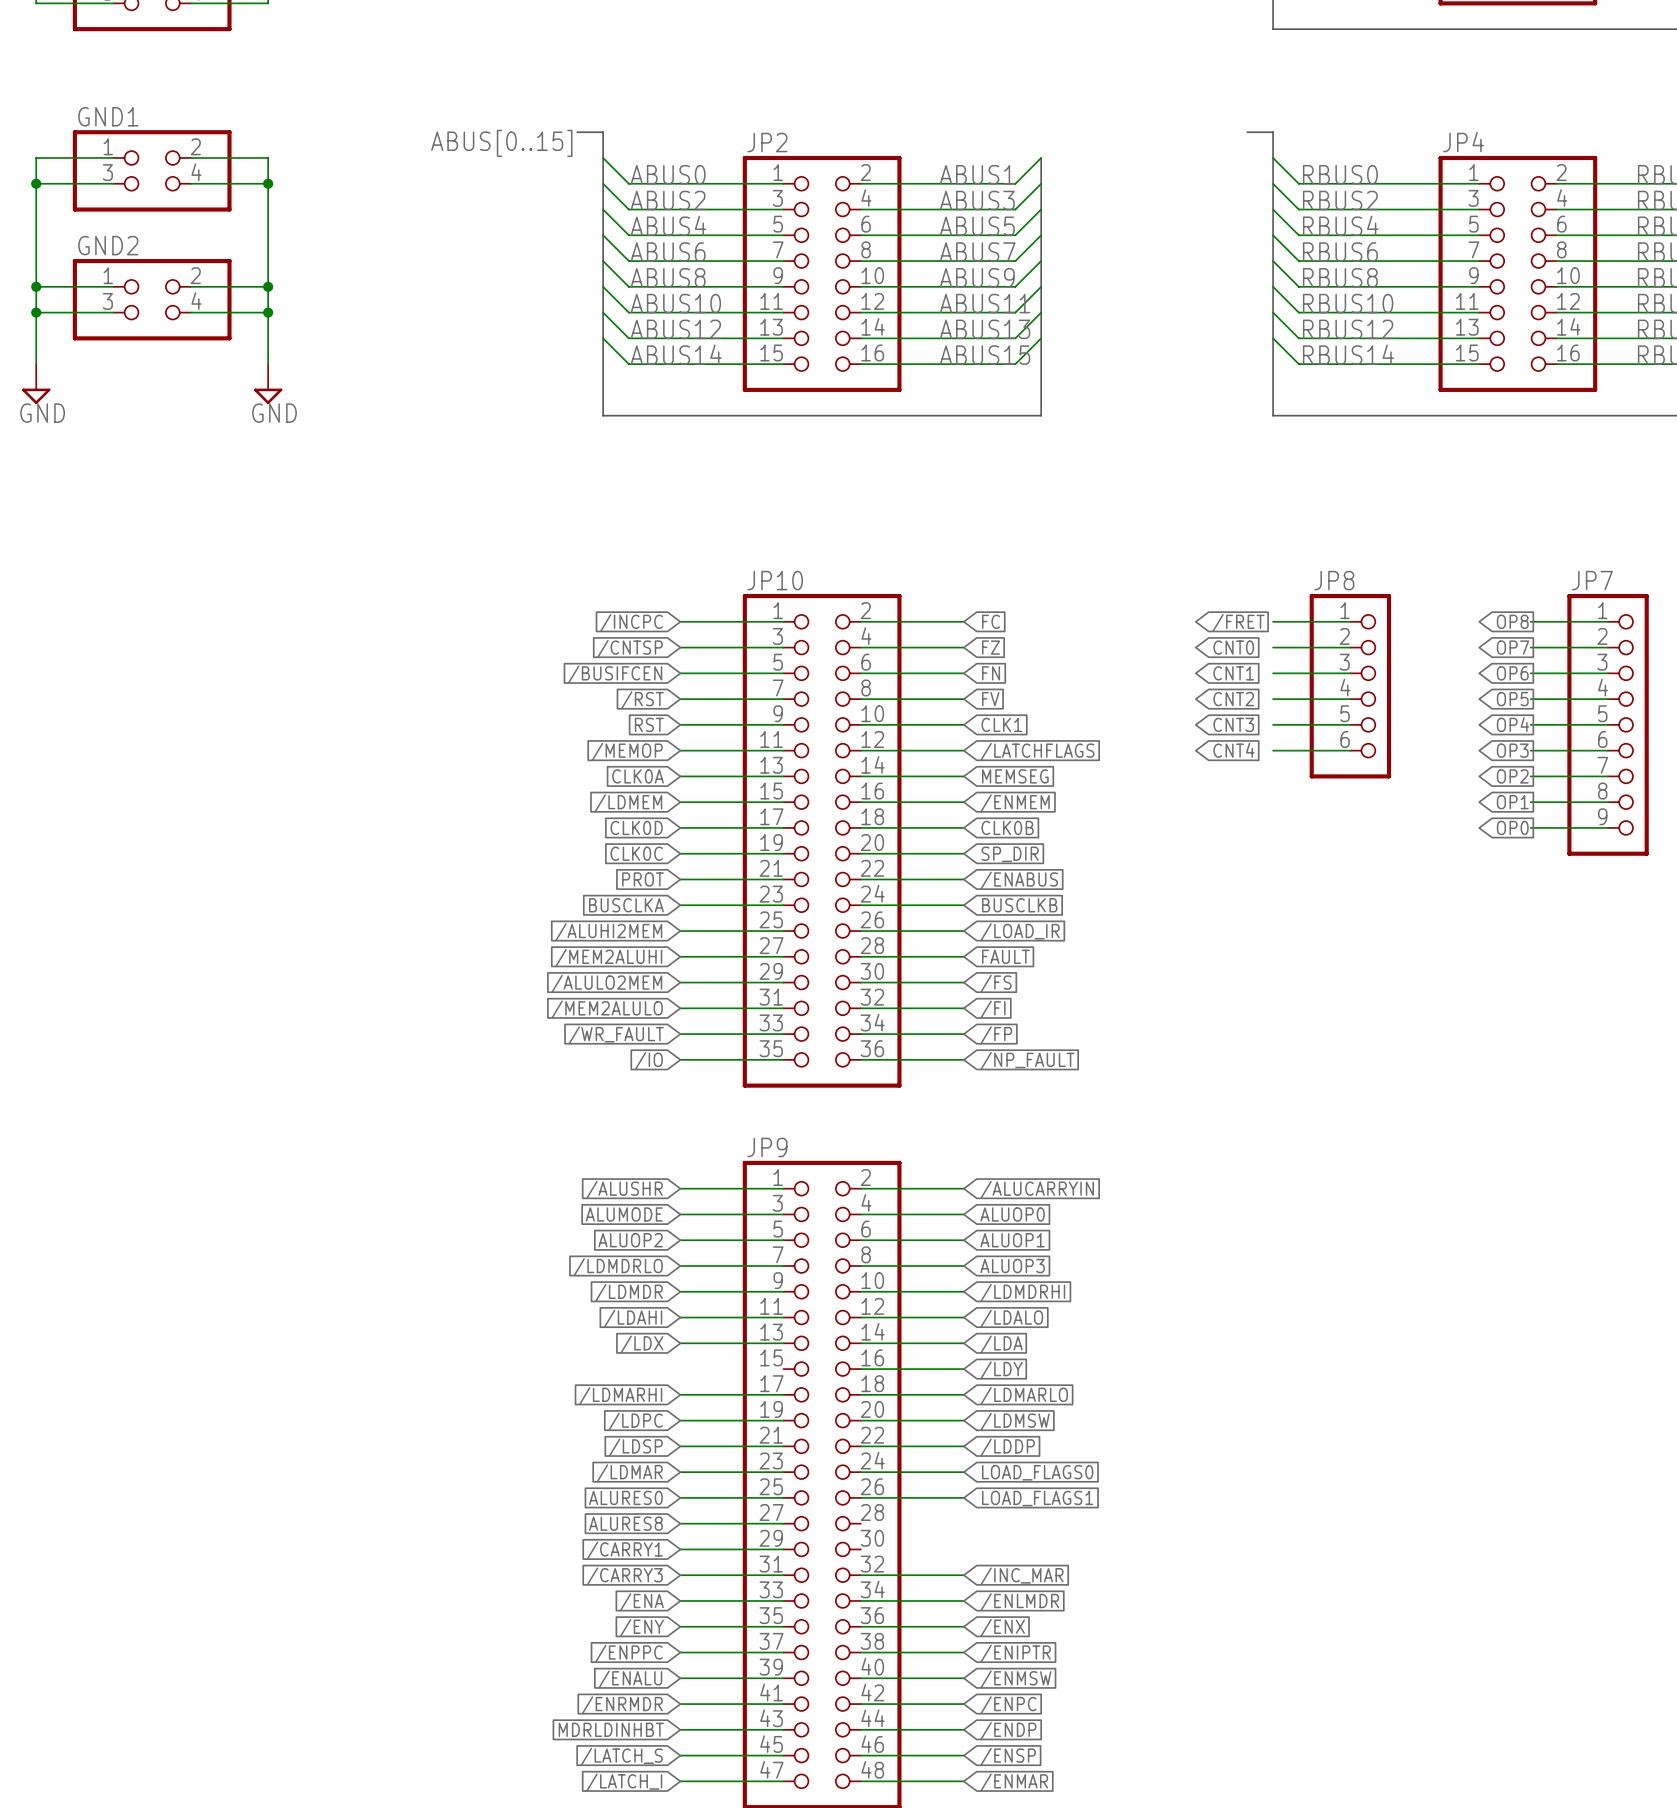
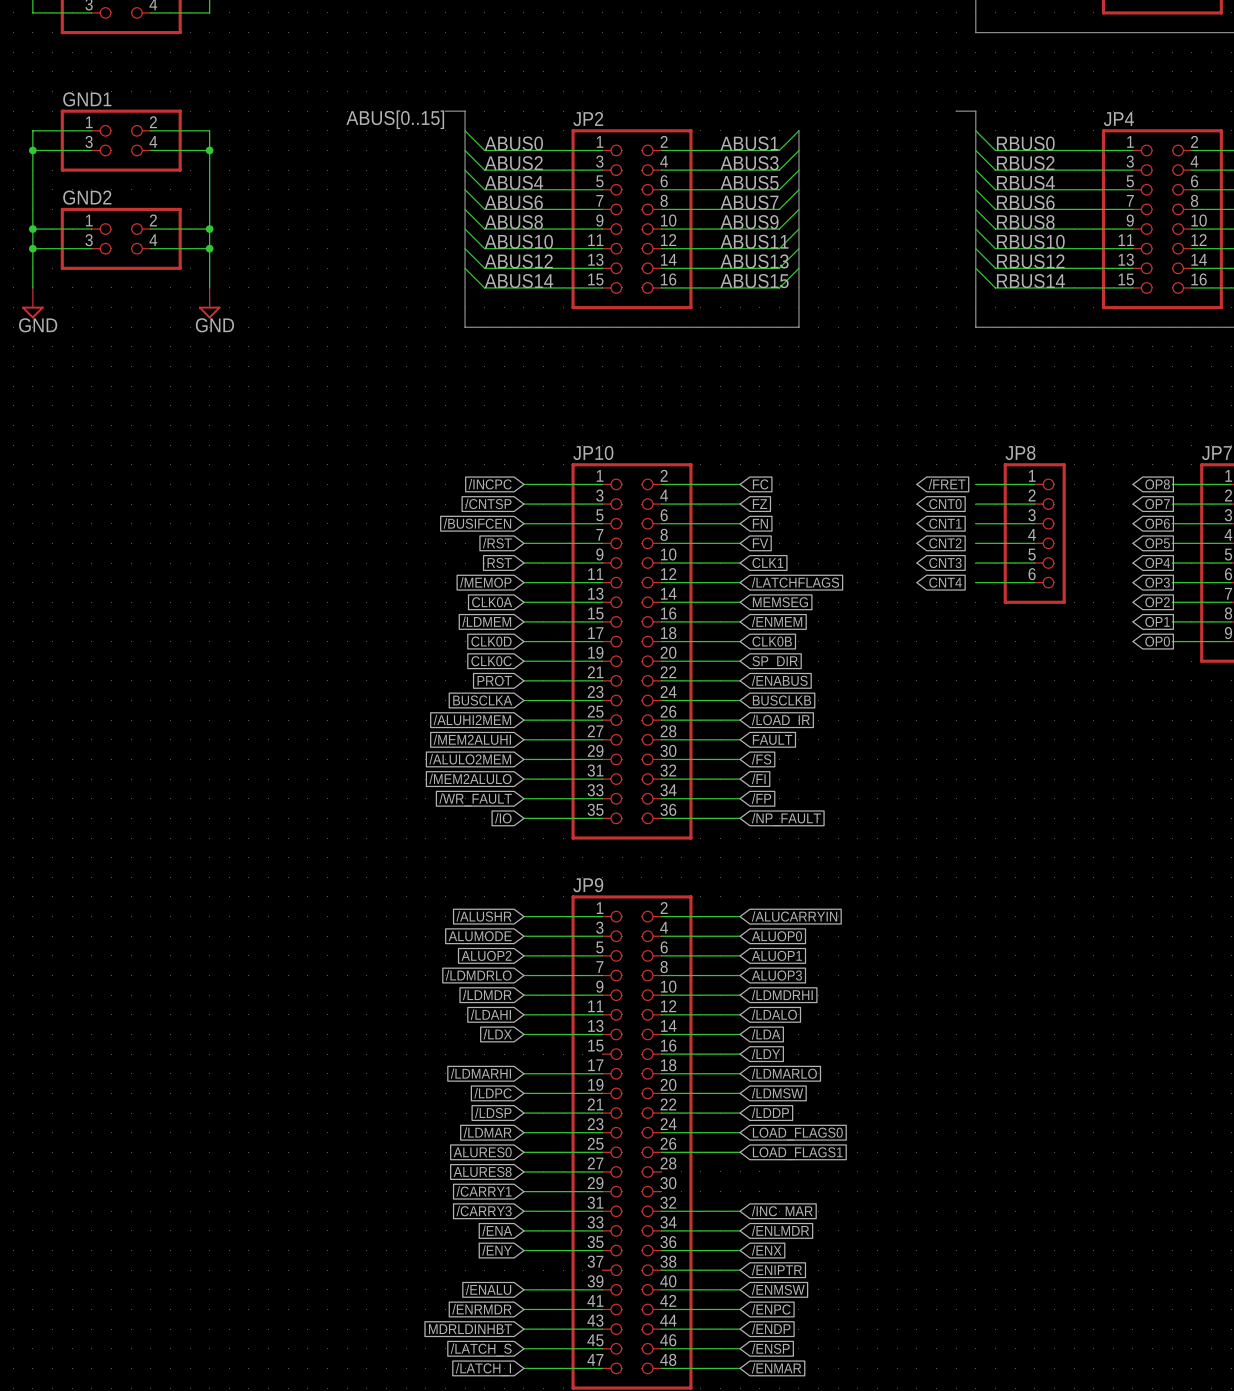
wire: (680, 1652) (783, 1652) -> none
global label: /ENPPC (628, 1653) -> none

